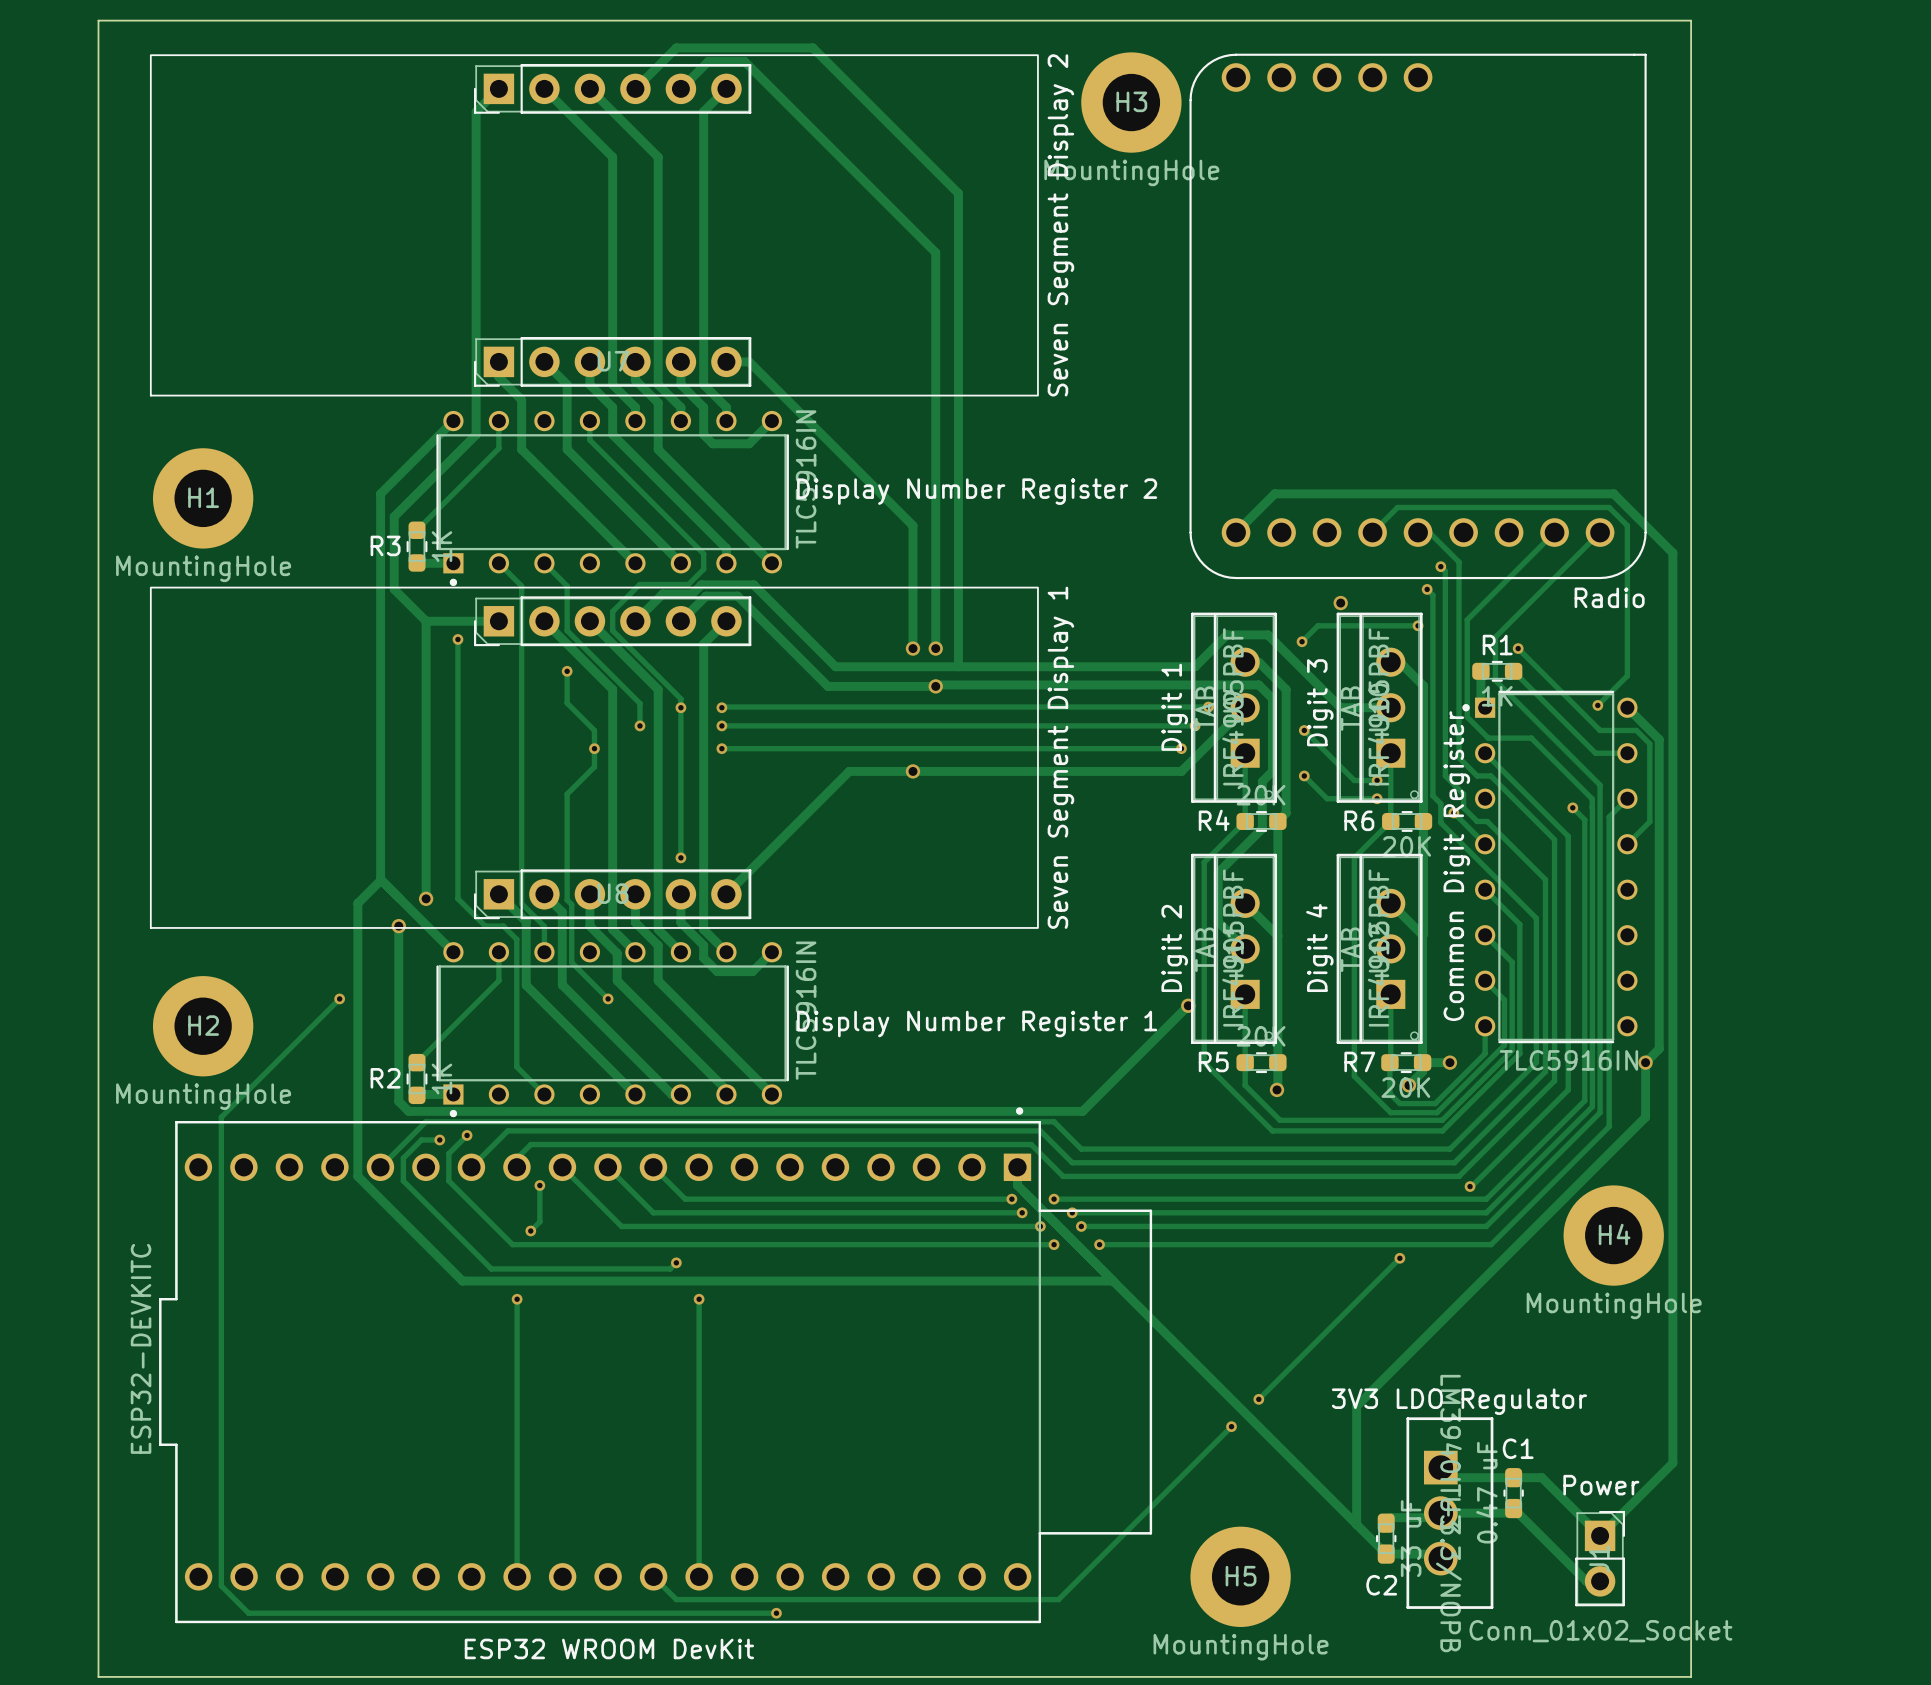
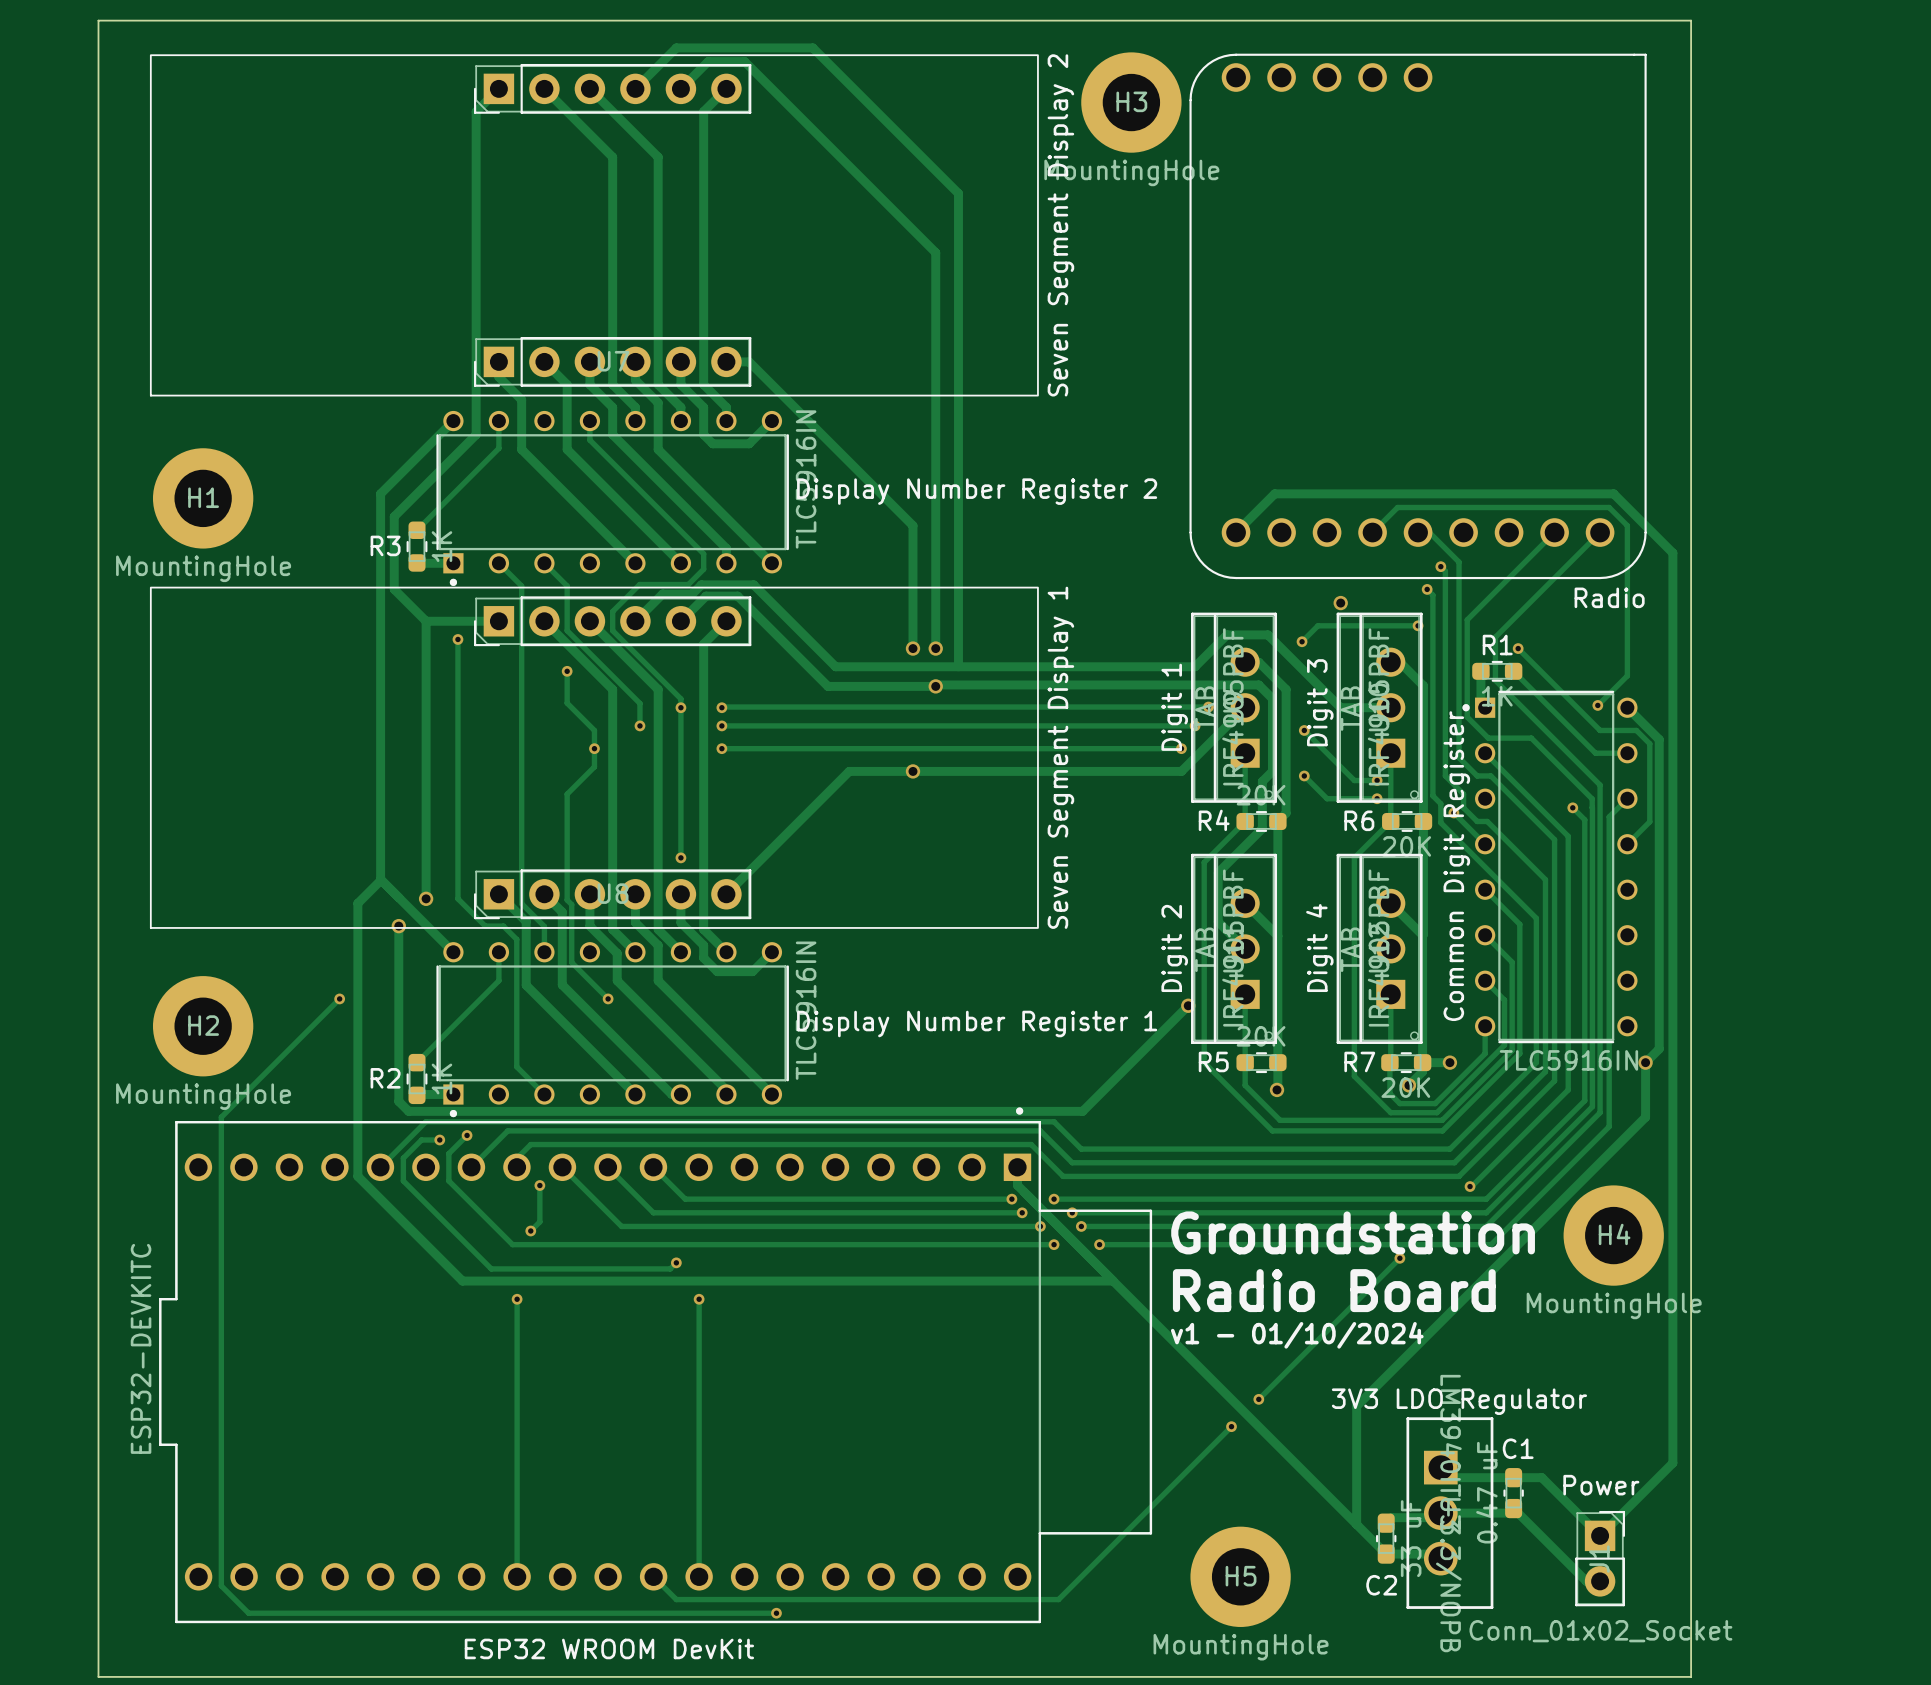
text: none -> Groundstation (1353, 1232)
text: none -> Radio Board (1334, 1290)
text: none -> v1 - 01/10/2024 (1297, 1335)

